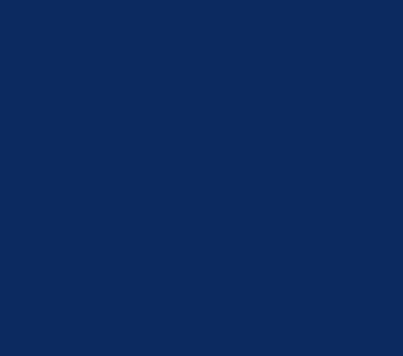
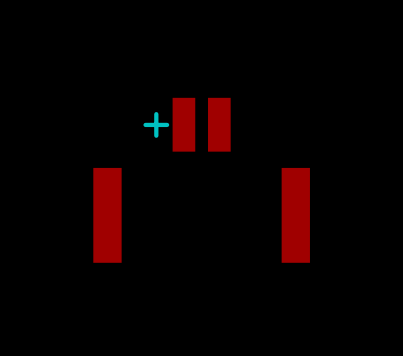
part: none -> (201, 180)

